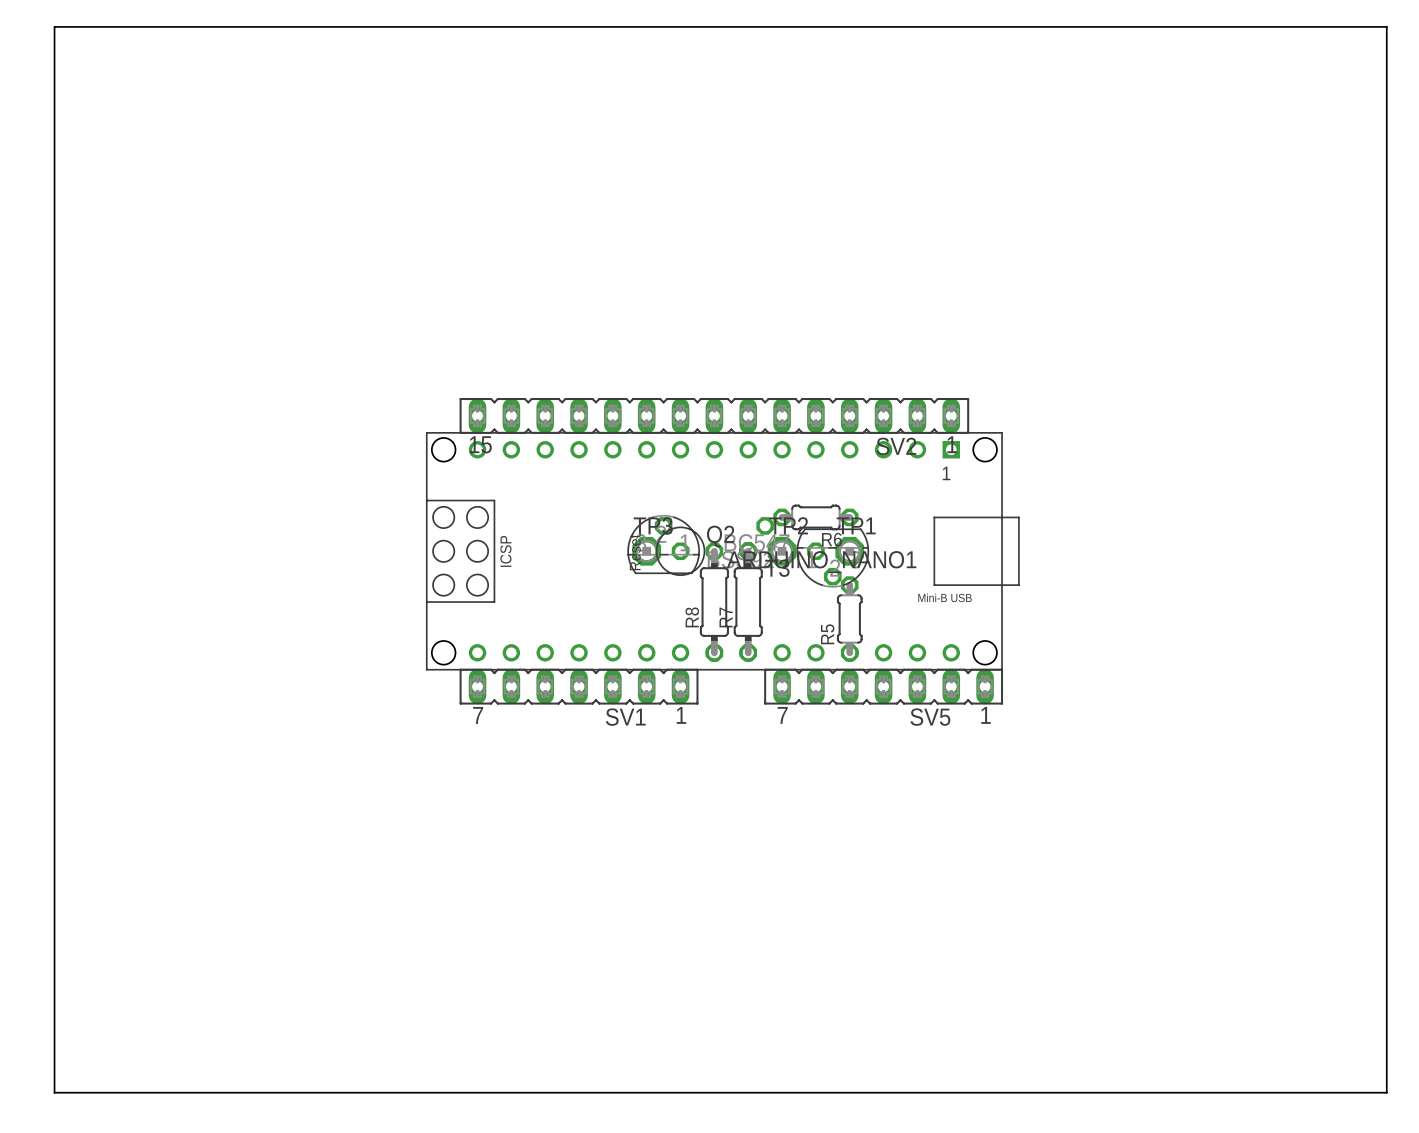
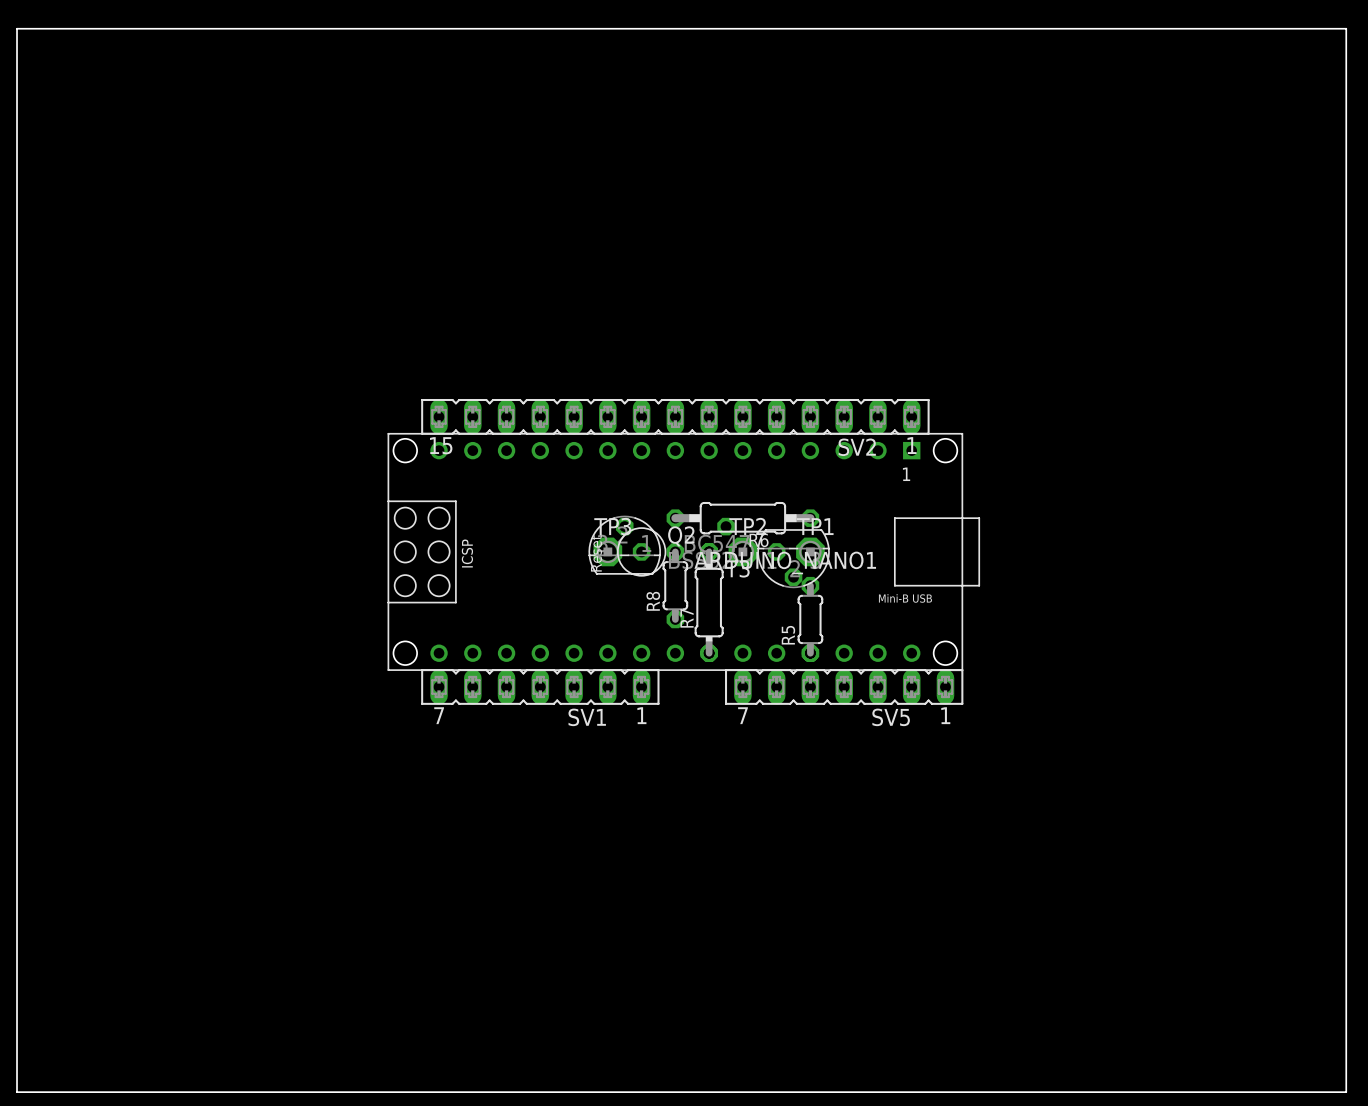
R6 footprint: [773, 504, 859, 531] -> [666, 501, 820, 535]
R8 footprint: [699, 542, 729, 662] -> [662, 543, 689, 629]

